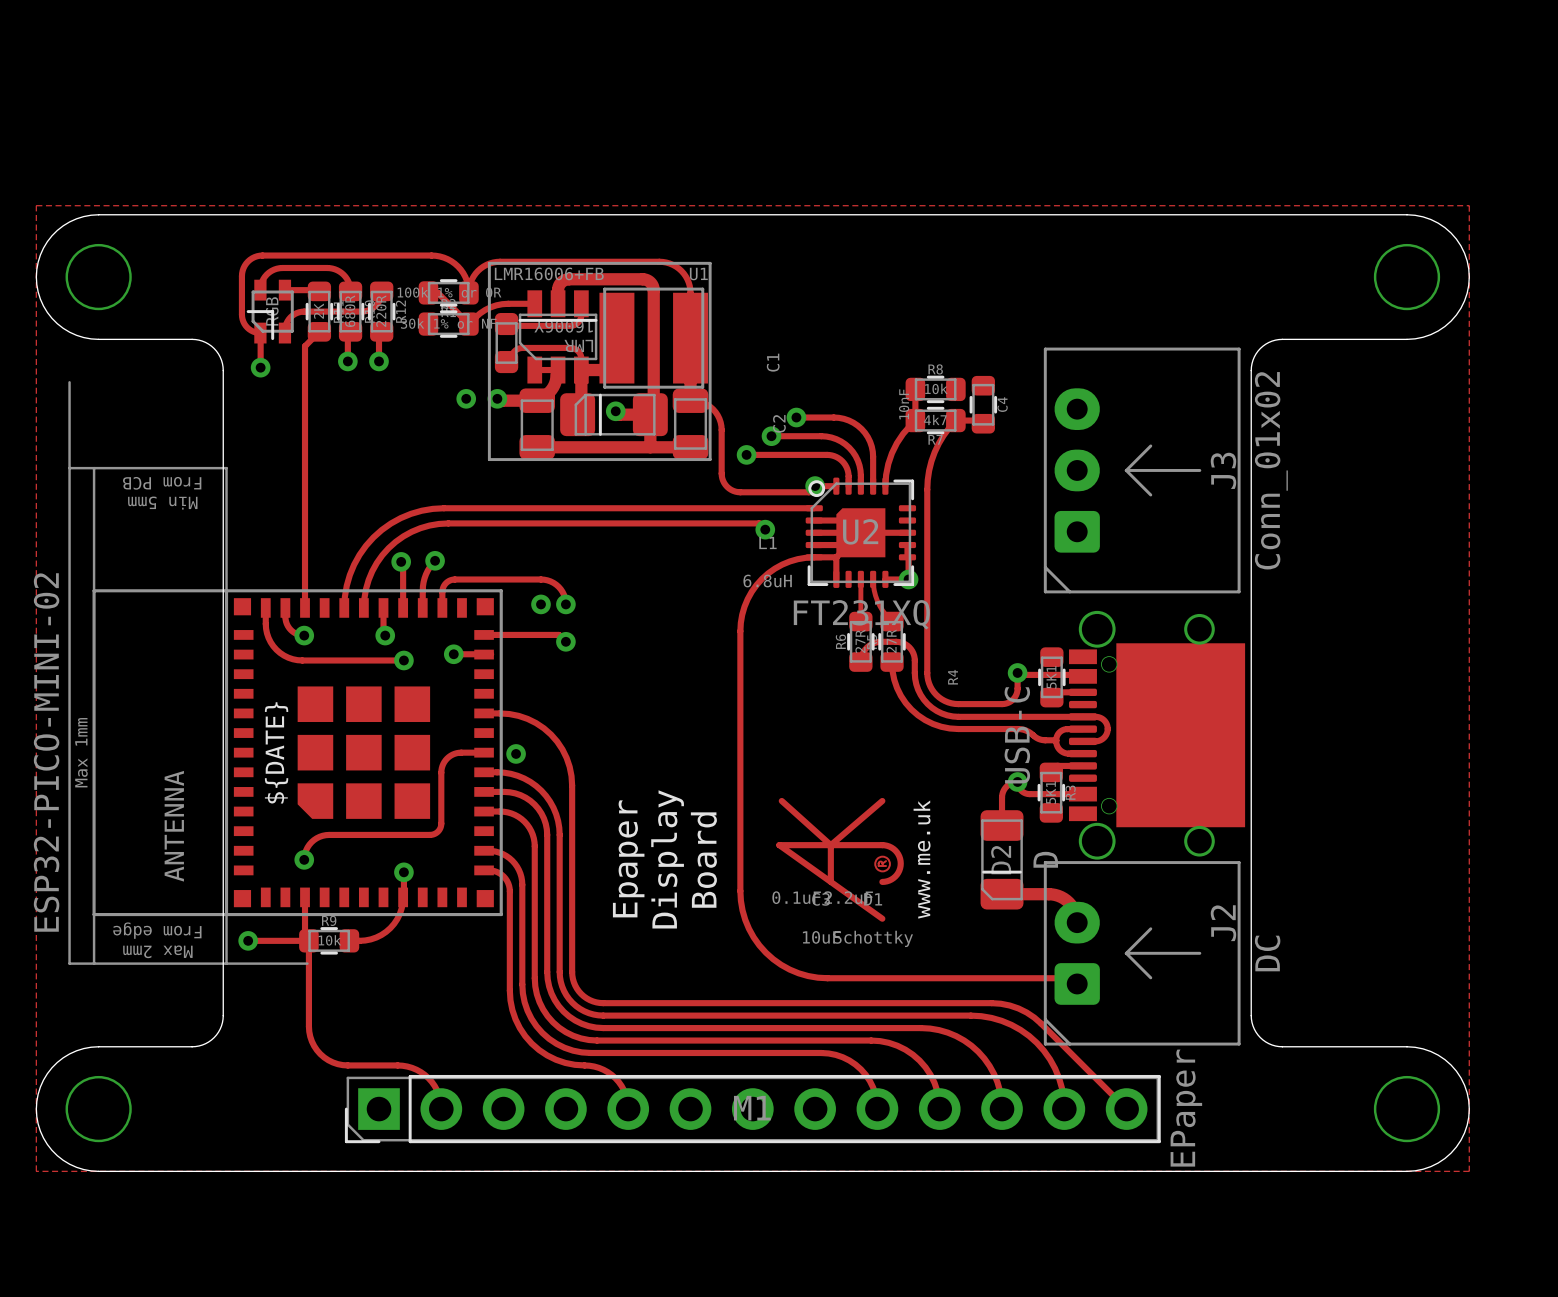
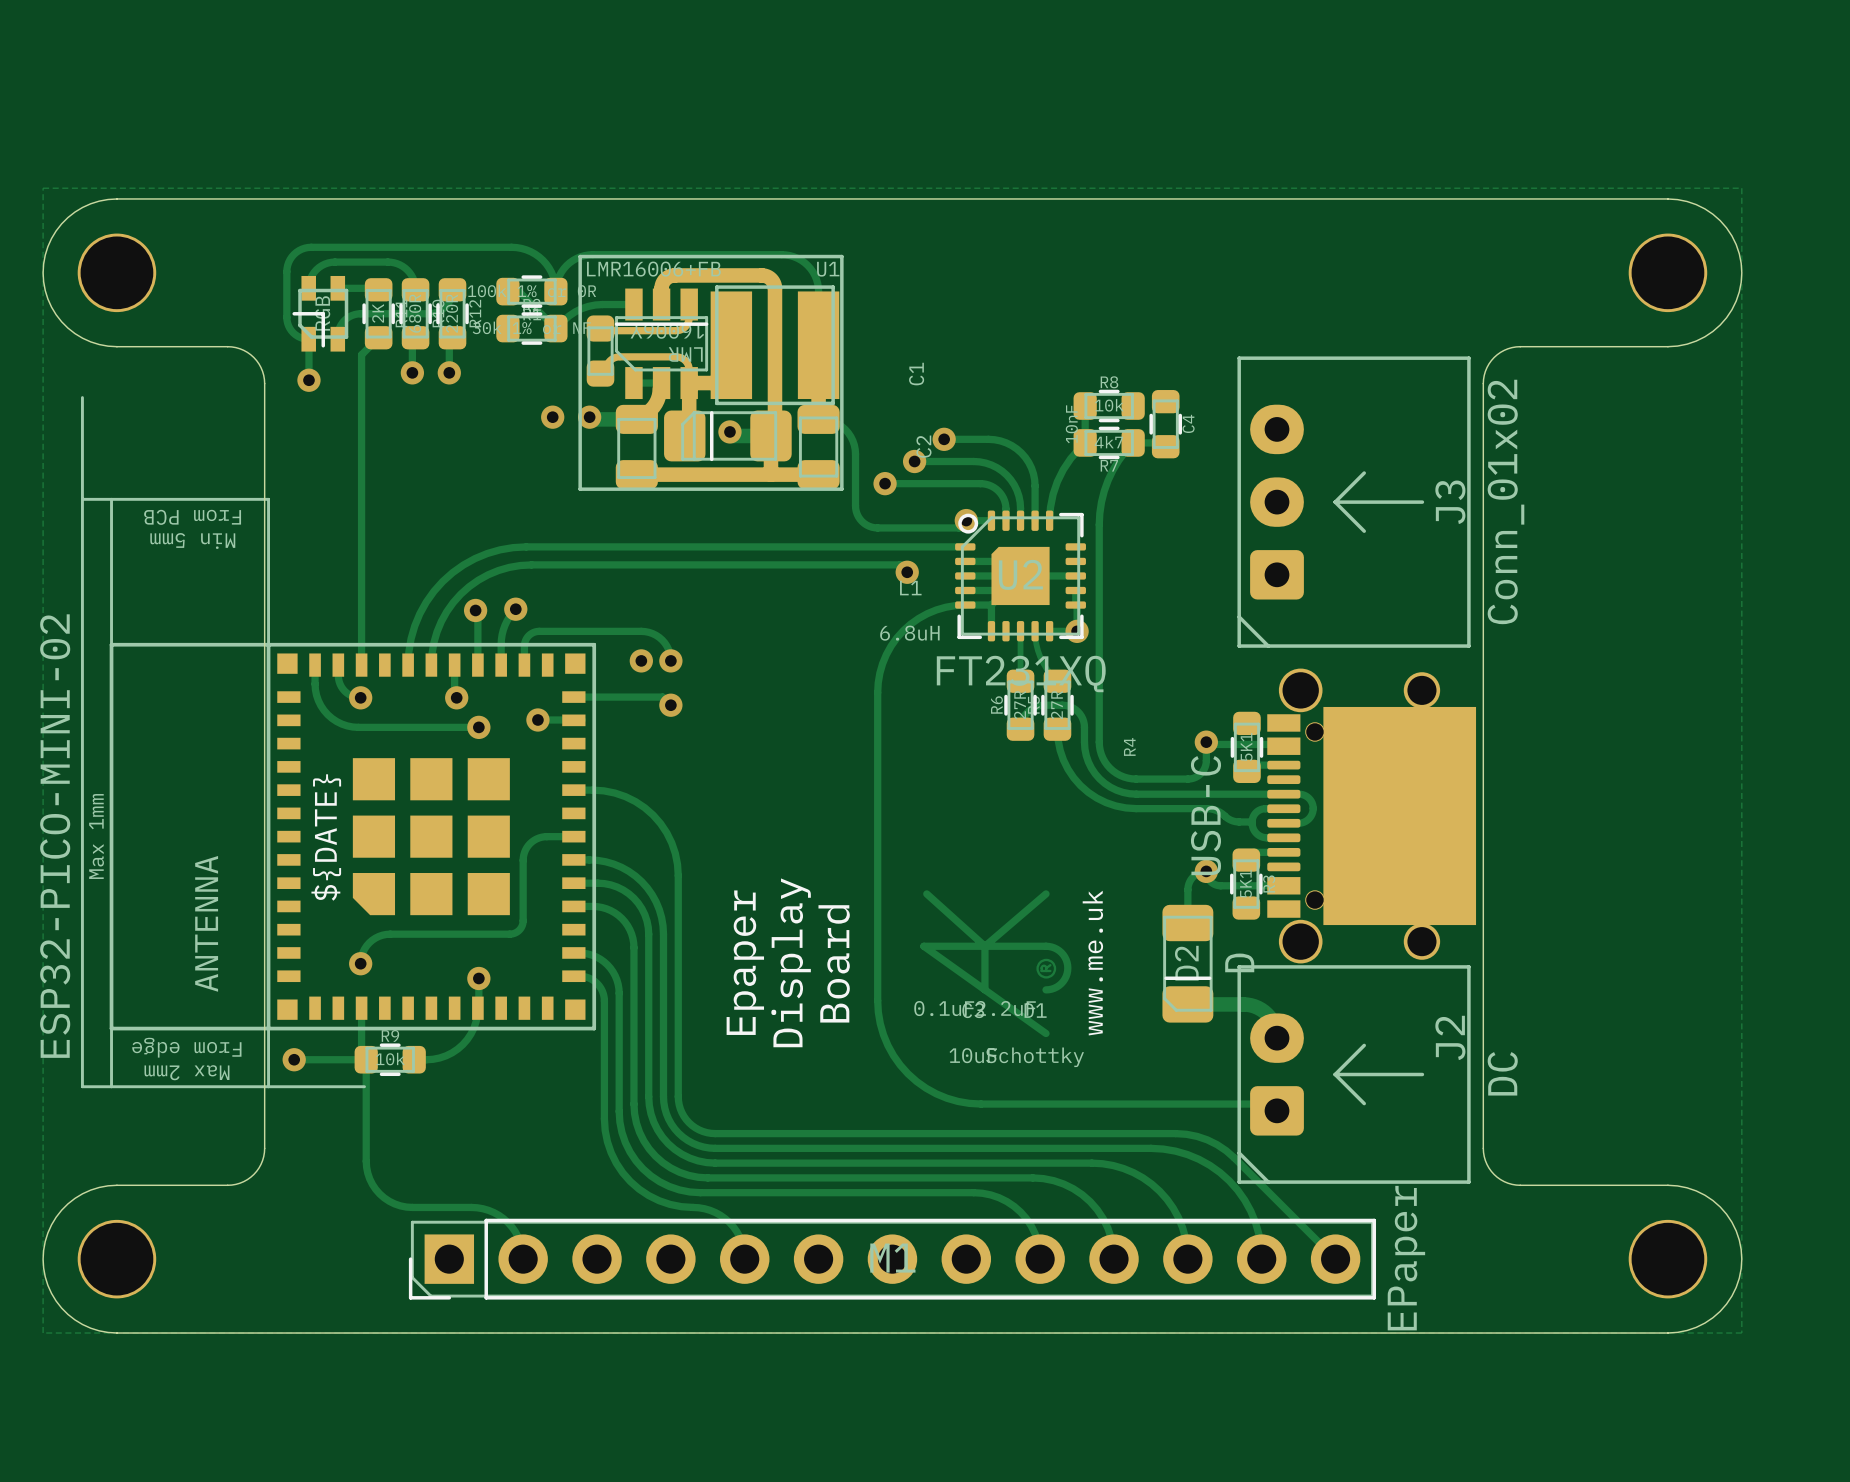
via: (516, 753) -> none

